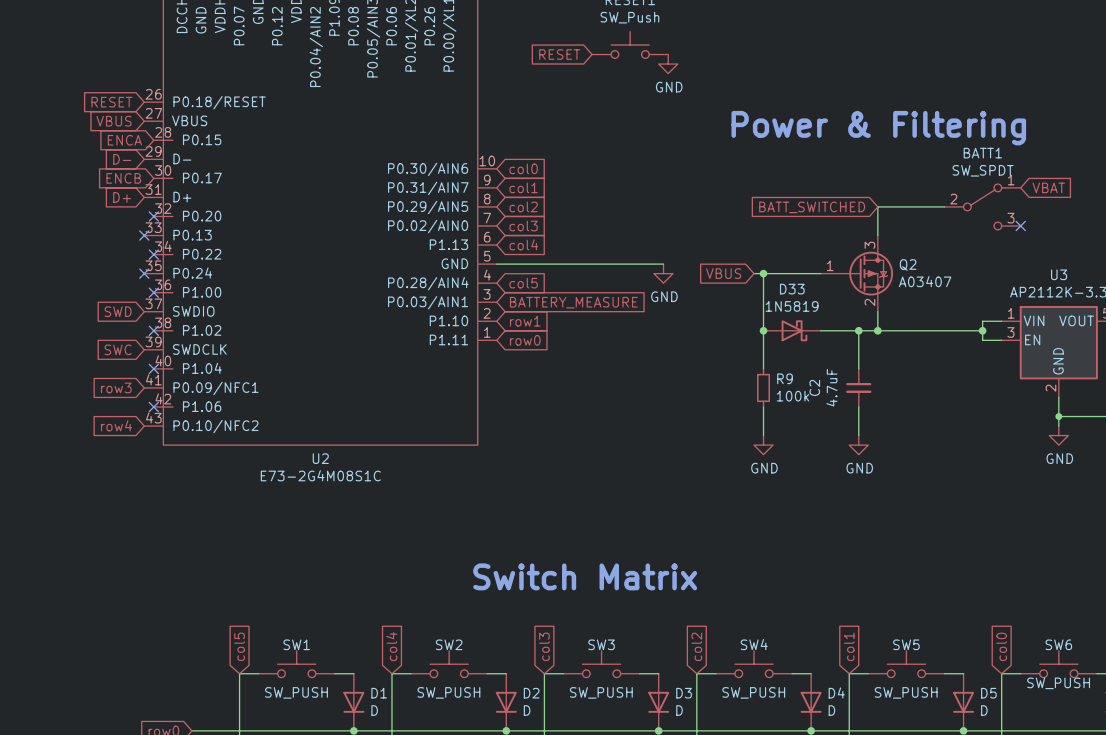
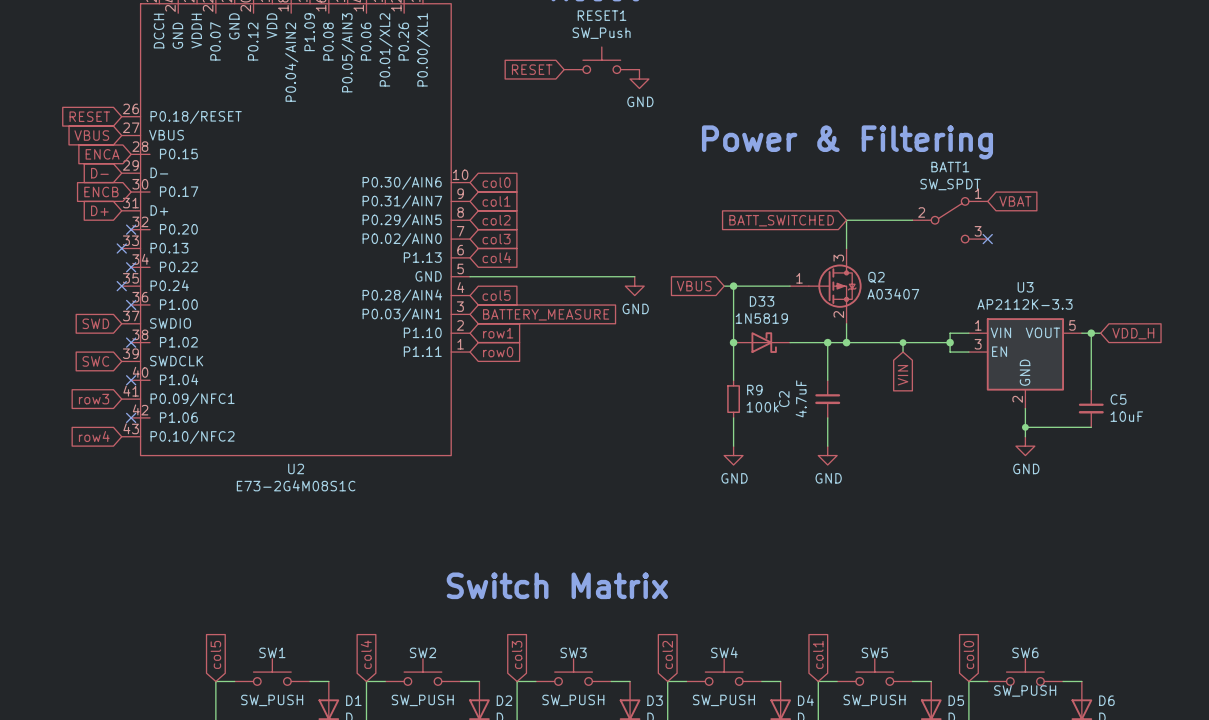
wire: none -> (903, 342) (903, 352)
junction: none -> (903, 342)
global label: none -> VIN (903, 375)

